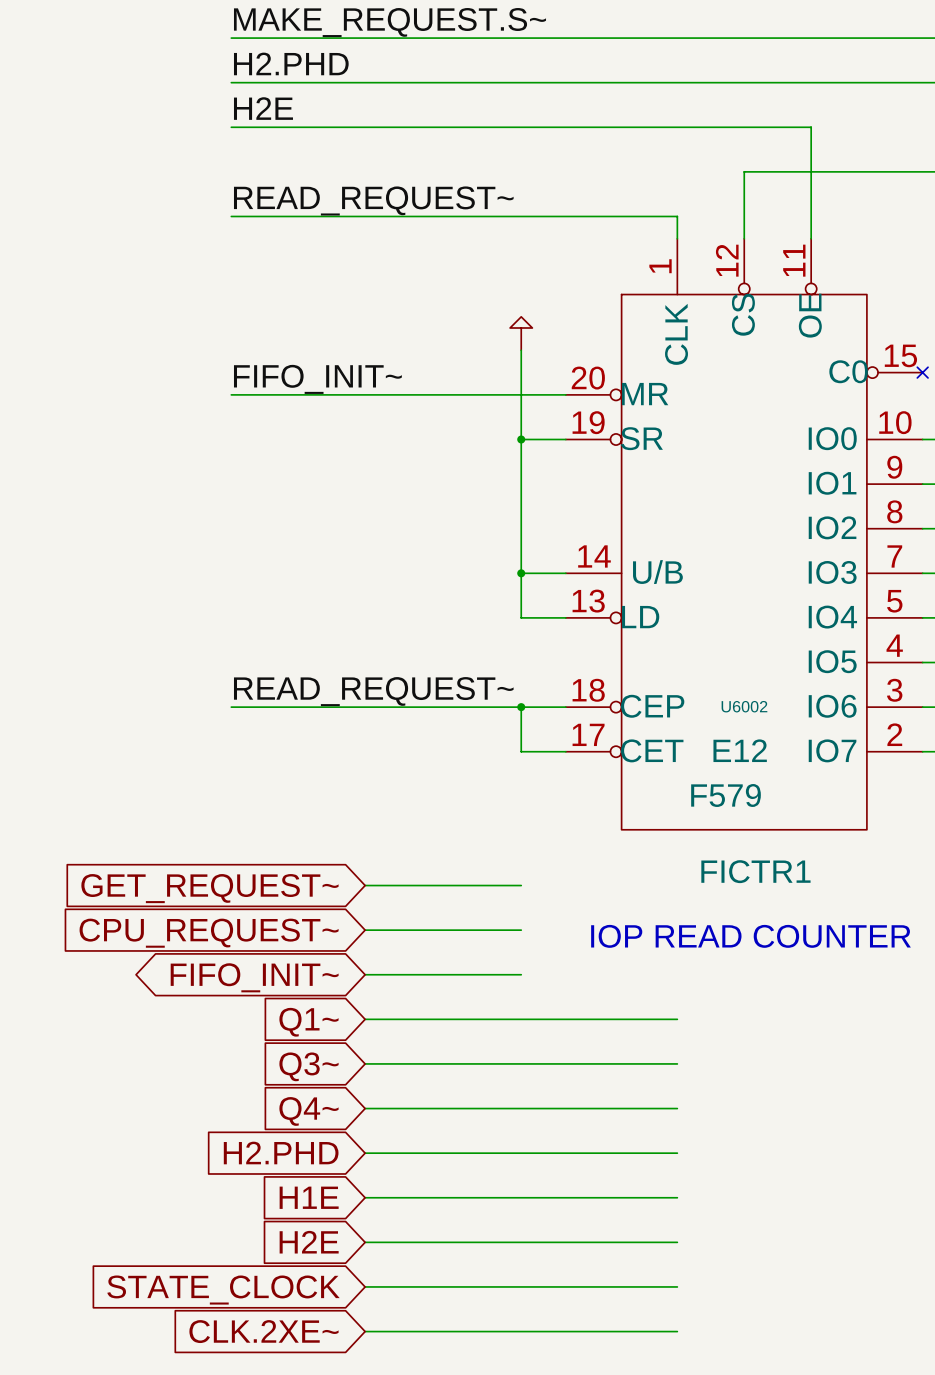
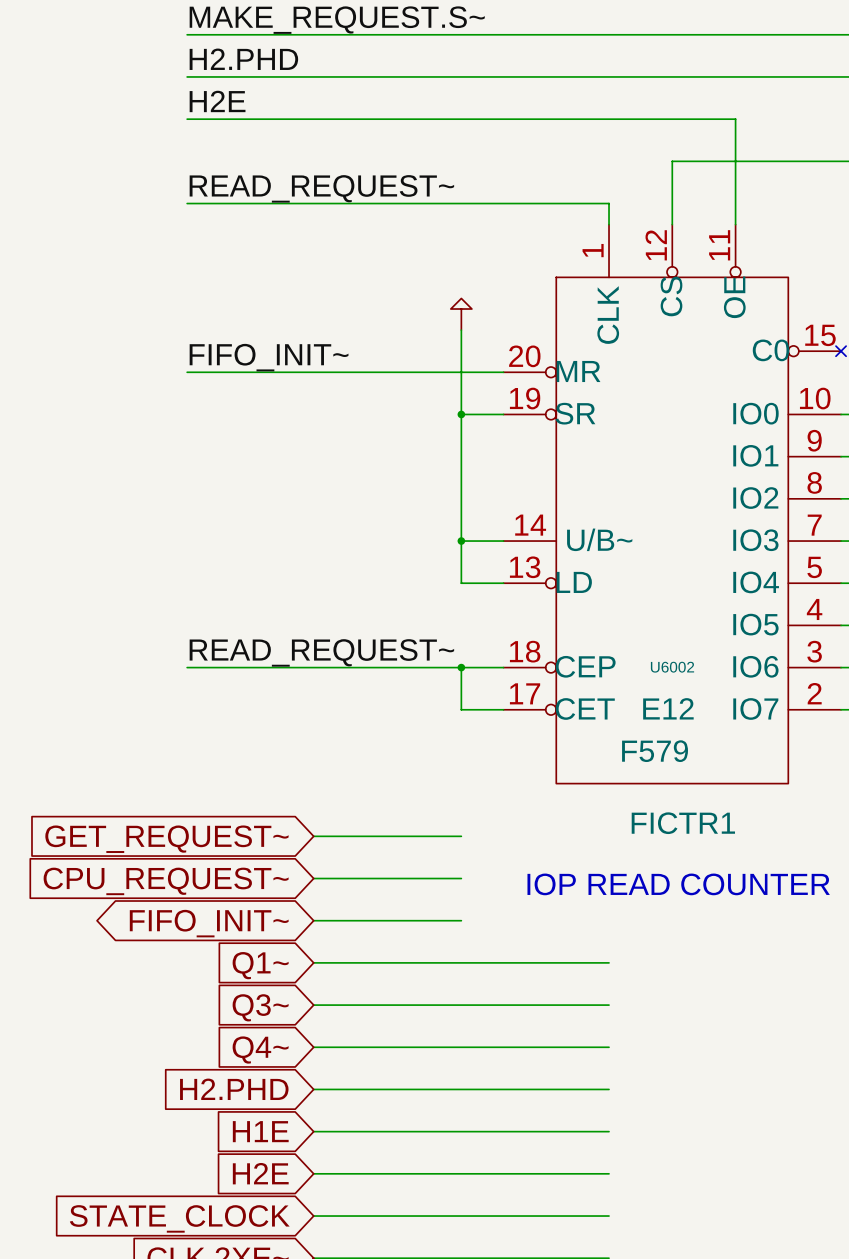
U6002 pin name: U/B (657, 572) -> U/B~ (599, 539)

